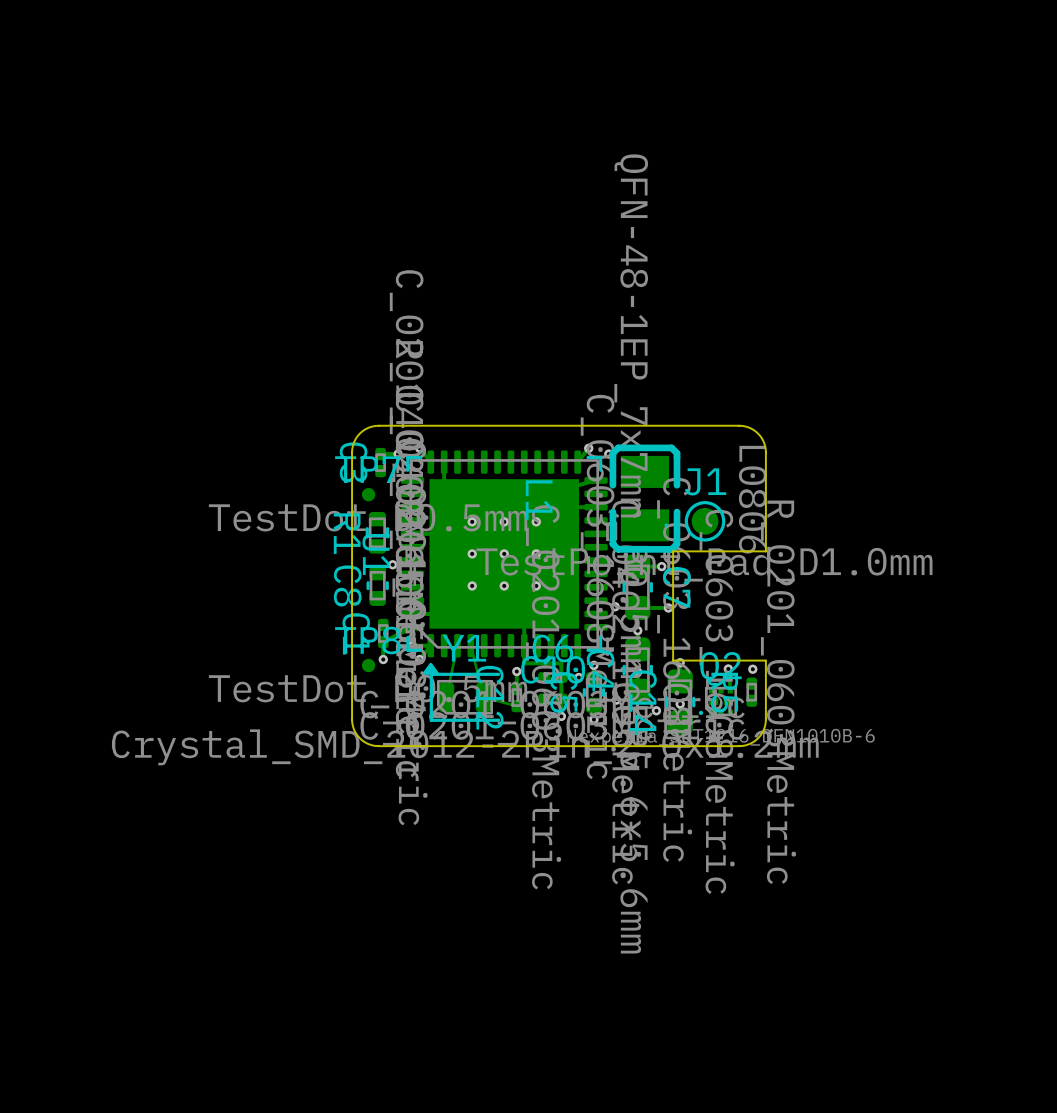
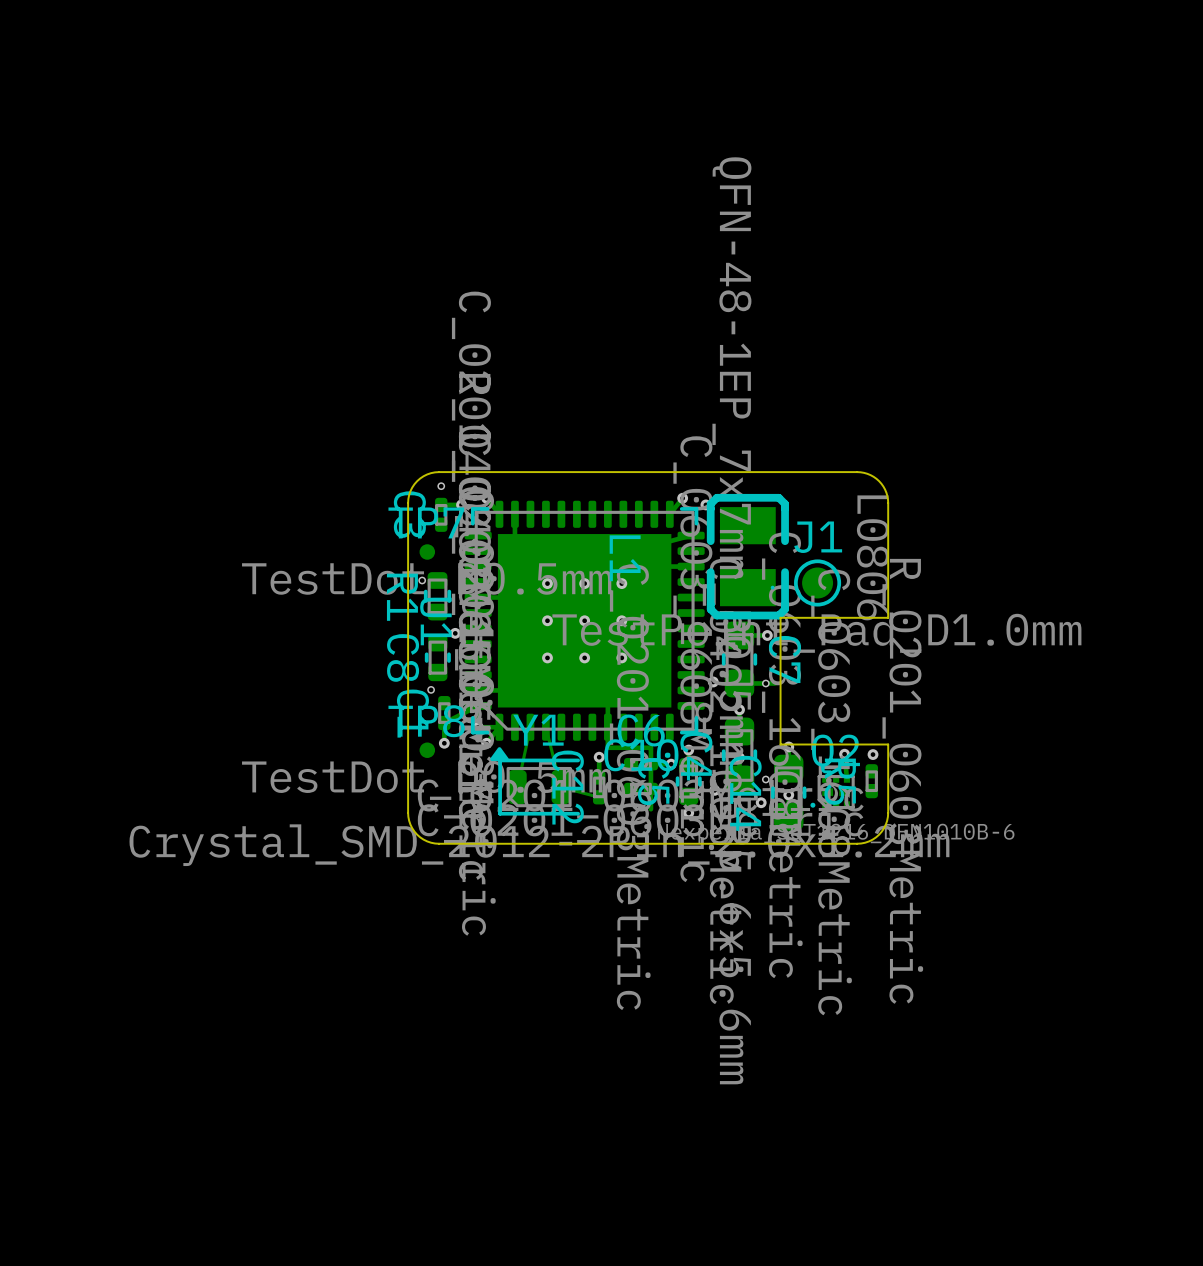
via: none -> (441, 486)
via: none -> (422, 580)
via: none -> (765, 683)
via: (668, 607) -> none
via: none -> (431, 689)
via: none -> (765, 779)
via: (561, 716) -> none

